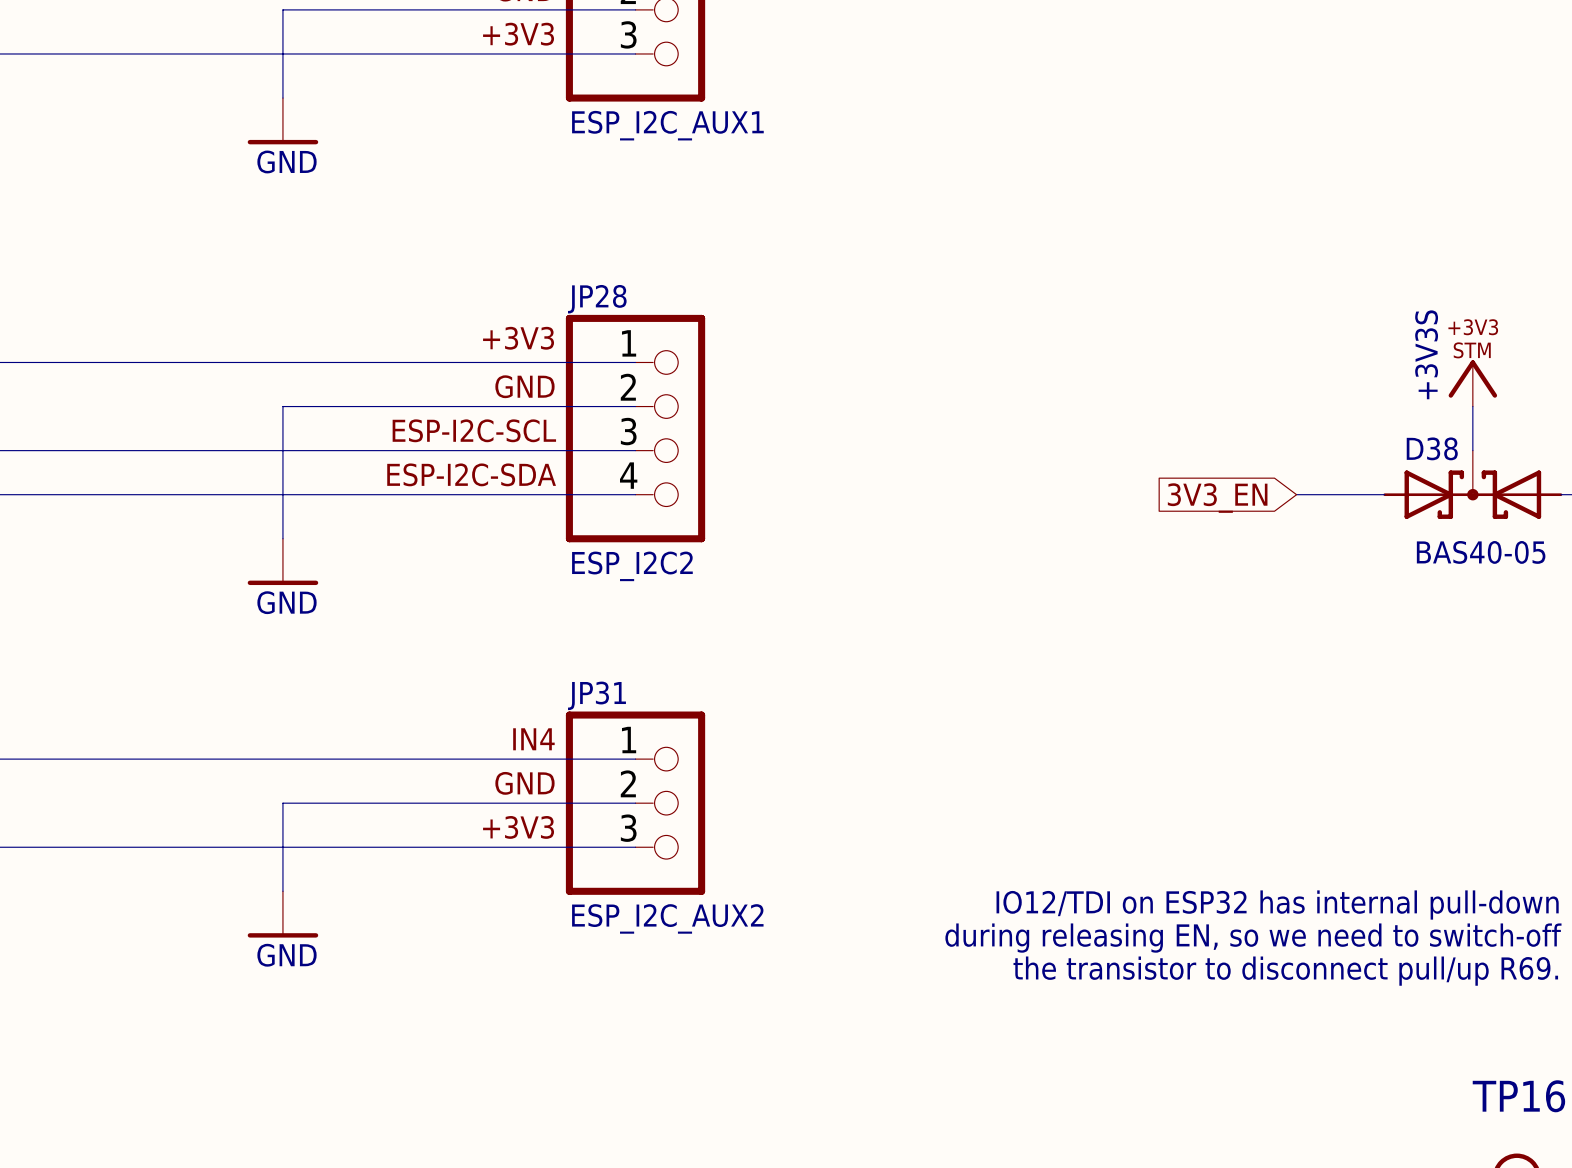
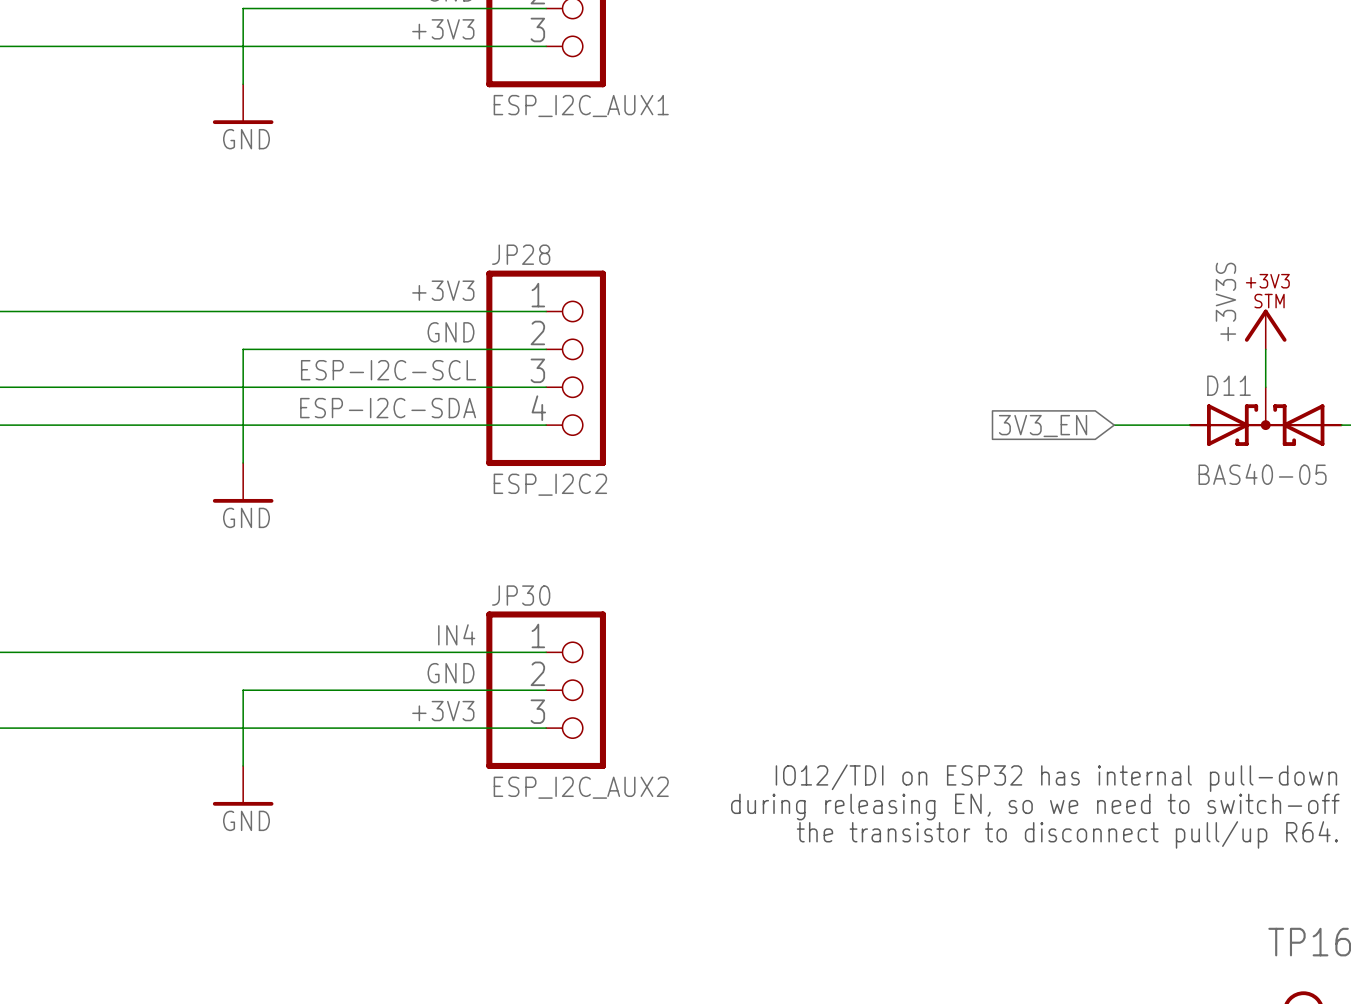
D38 name: D38 (1432, 448) -> D11 (1229, 385)
JP31 name: JP31 (596, 695) -> JP30 (521, 595)
text: the transistor to disconnect pull/up R69. (1285, 971) -> the transistor to disconnect pull/up R64. (1067, 834)

